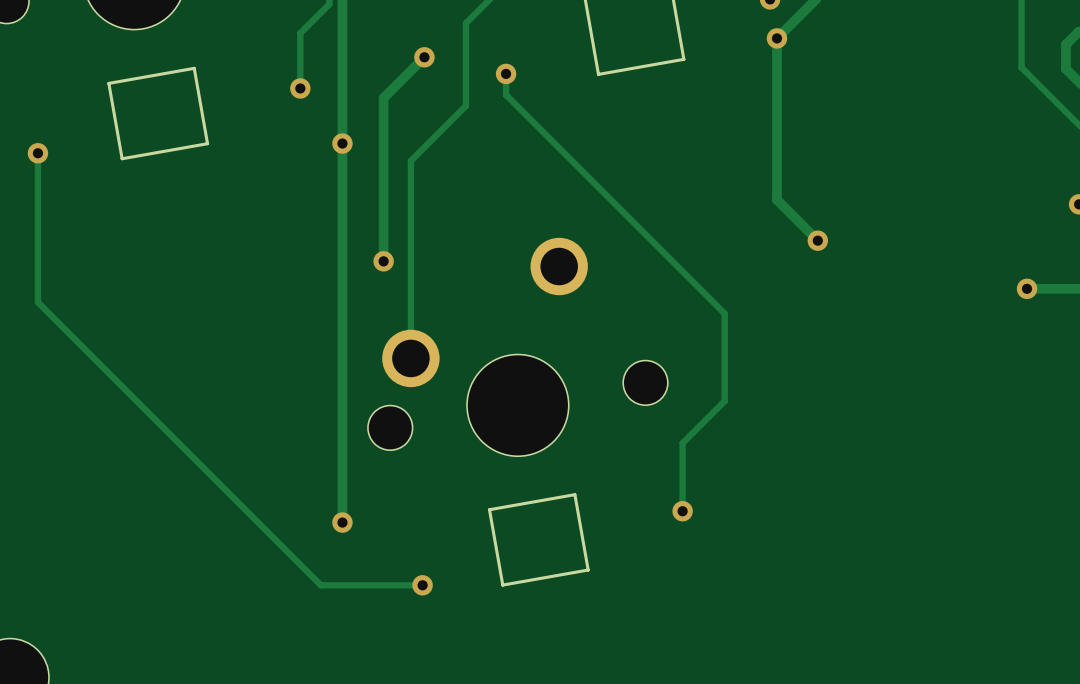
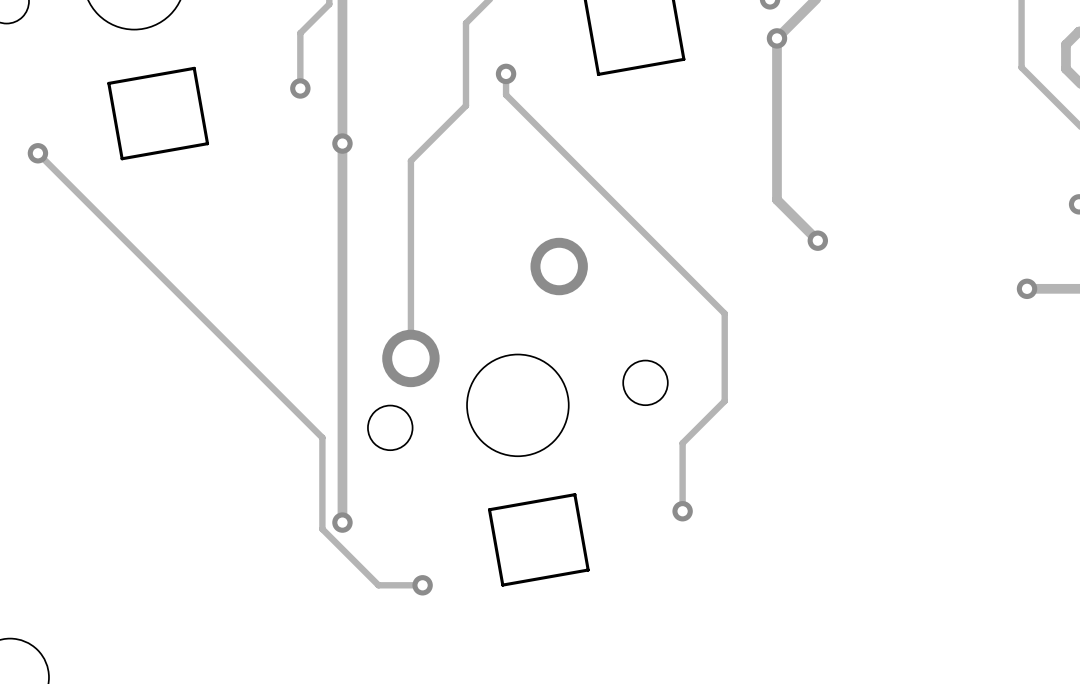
track: (424, 57) (383, 98) (383, 261) -> none
via: (424, 57) -> none
track: (37, 153) (37, 302) (320, 585) (378, 585) -> (37, 153) (322, 437) (322, 529) (378, 585)
via: (383, 261) -> none

